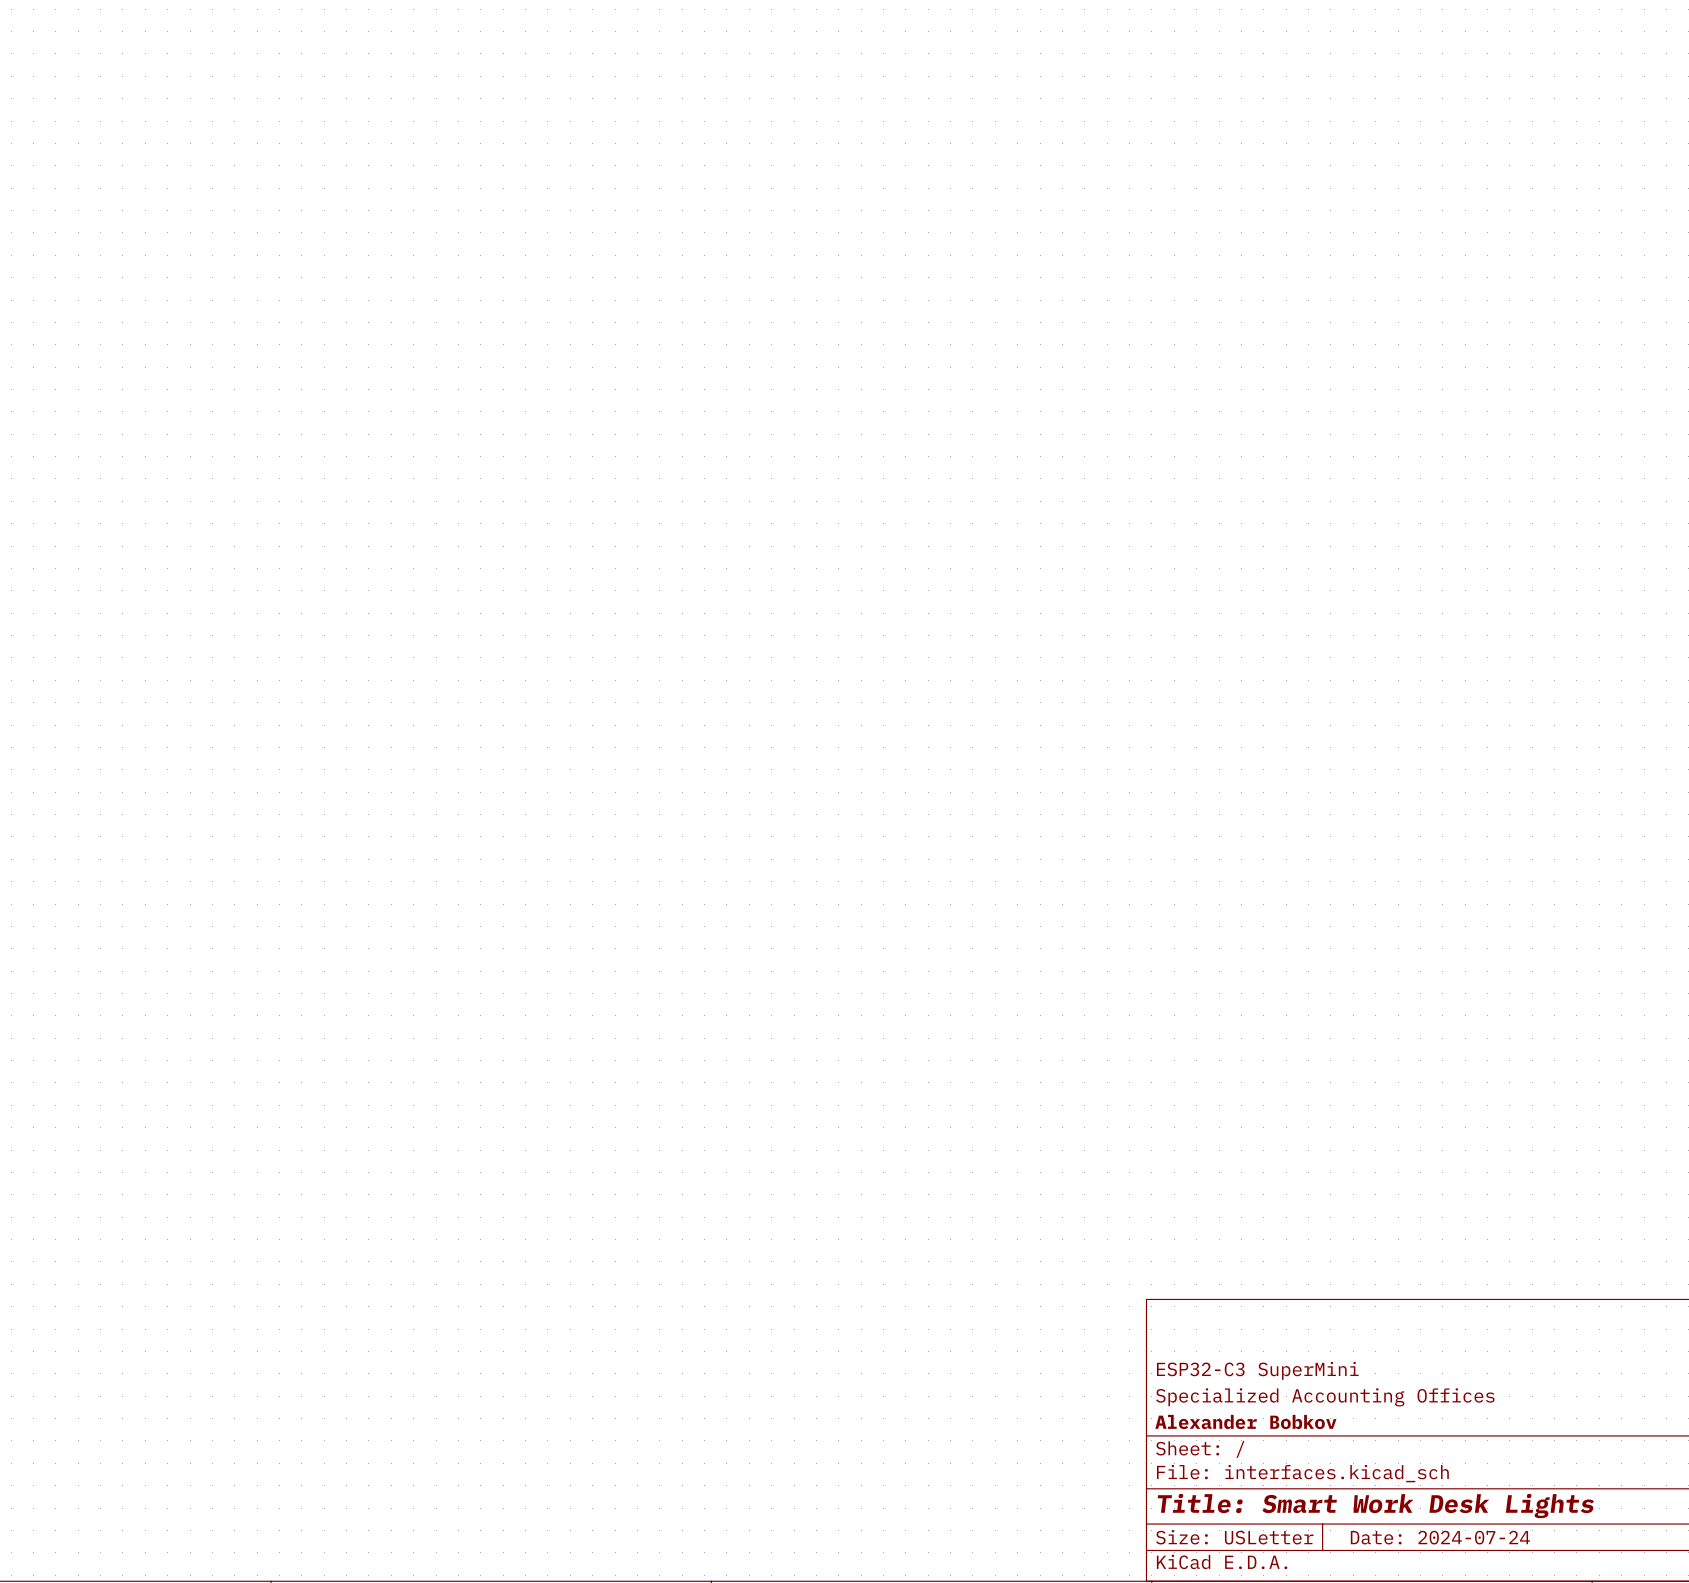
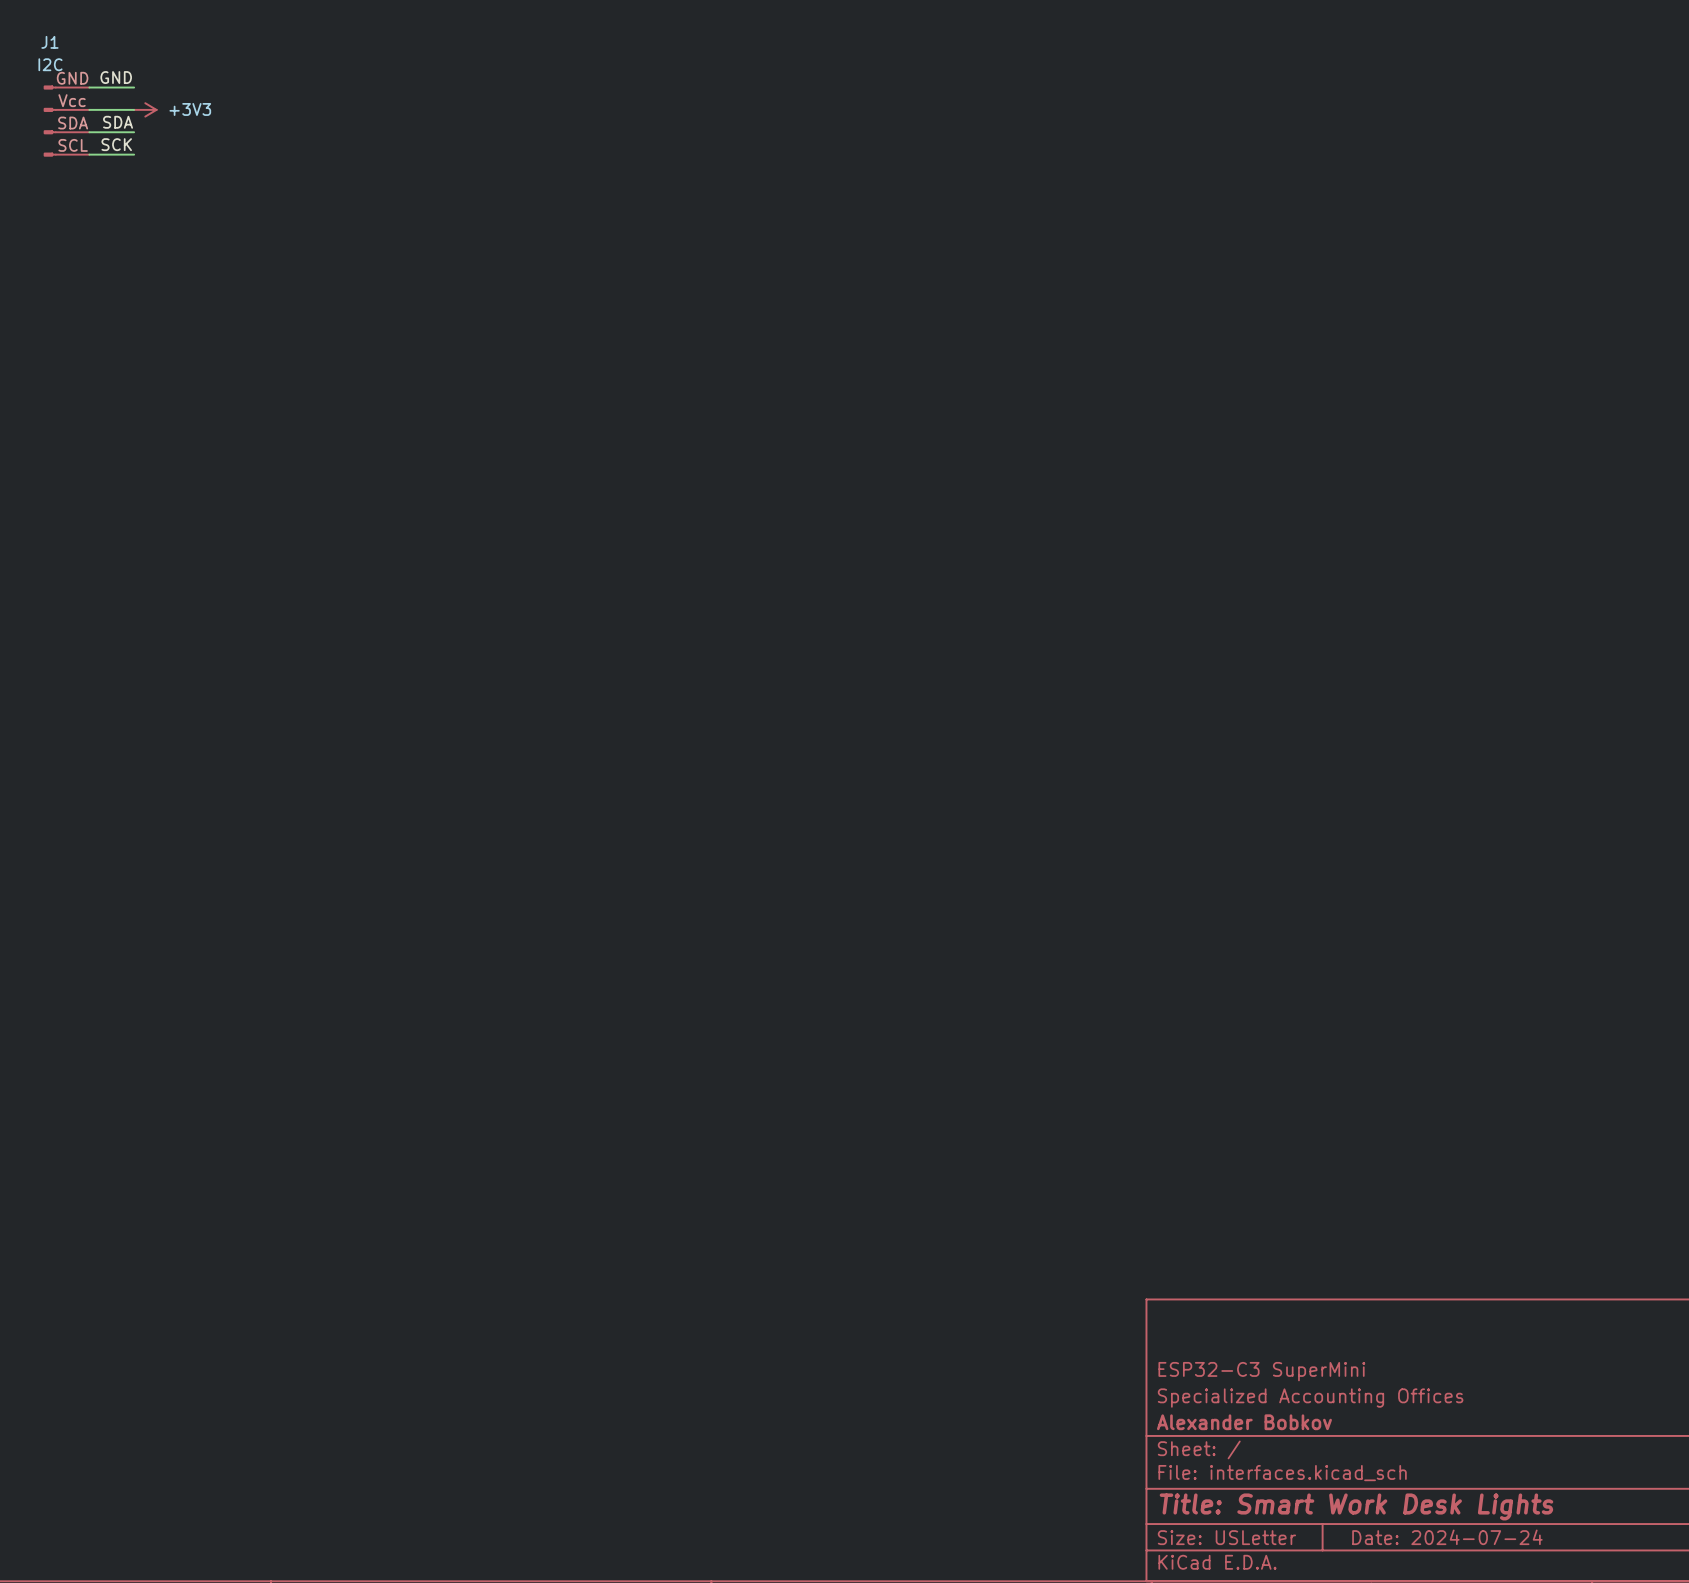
label: none -> GND (116, 77)
wire: none -> (89, 87) (134, 87)
wire: none -> (89, 109) (134, 109)
power symbol: none -> +3V3 (145, 109)
J1: none -> I2C (66, 121)
label: none -> SDA (118, 122)
wire: none -> (89, 132) (134, 132)
label: none -> SCK (116, 144)
wire: none -> (89, 154) (134, 154)

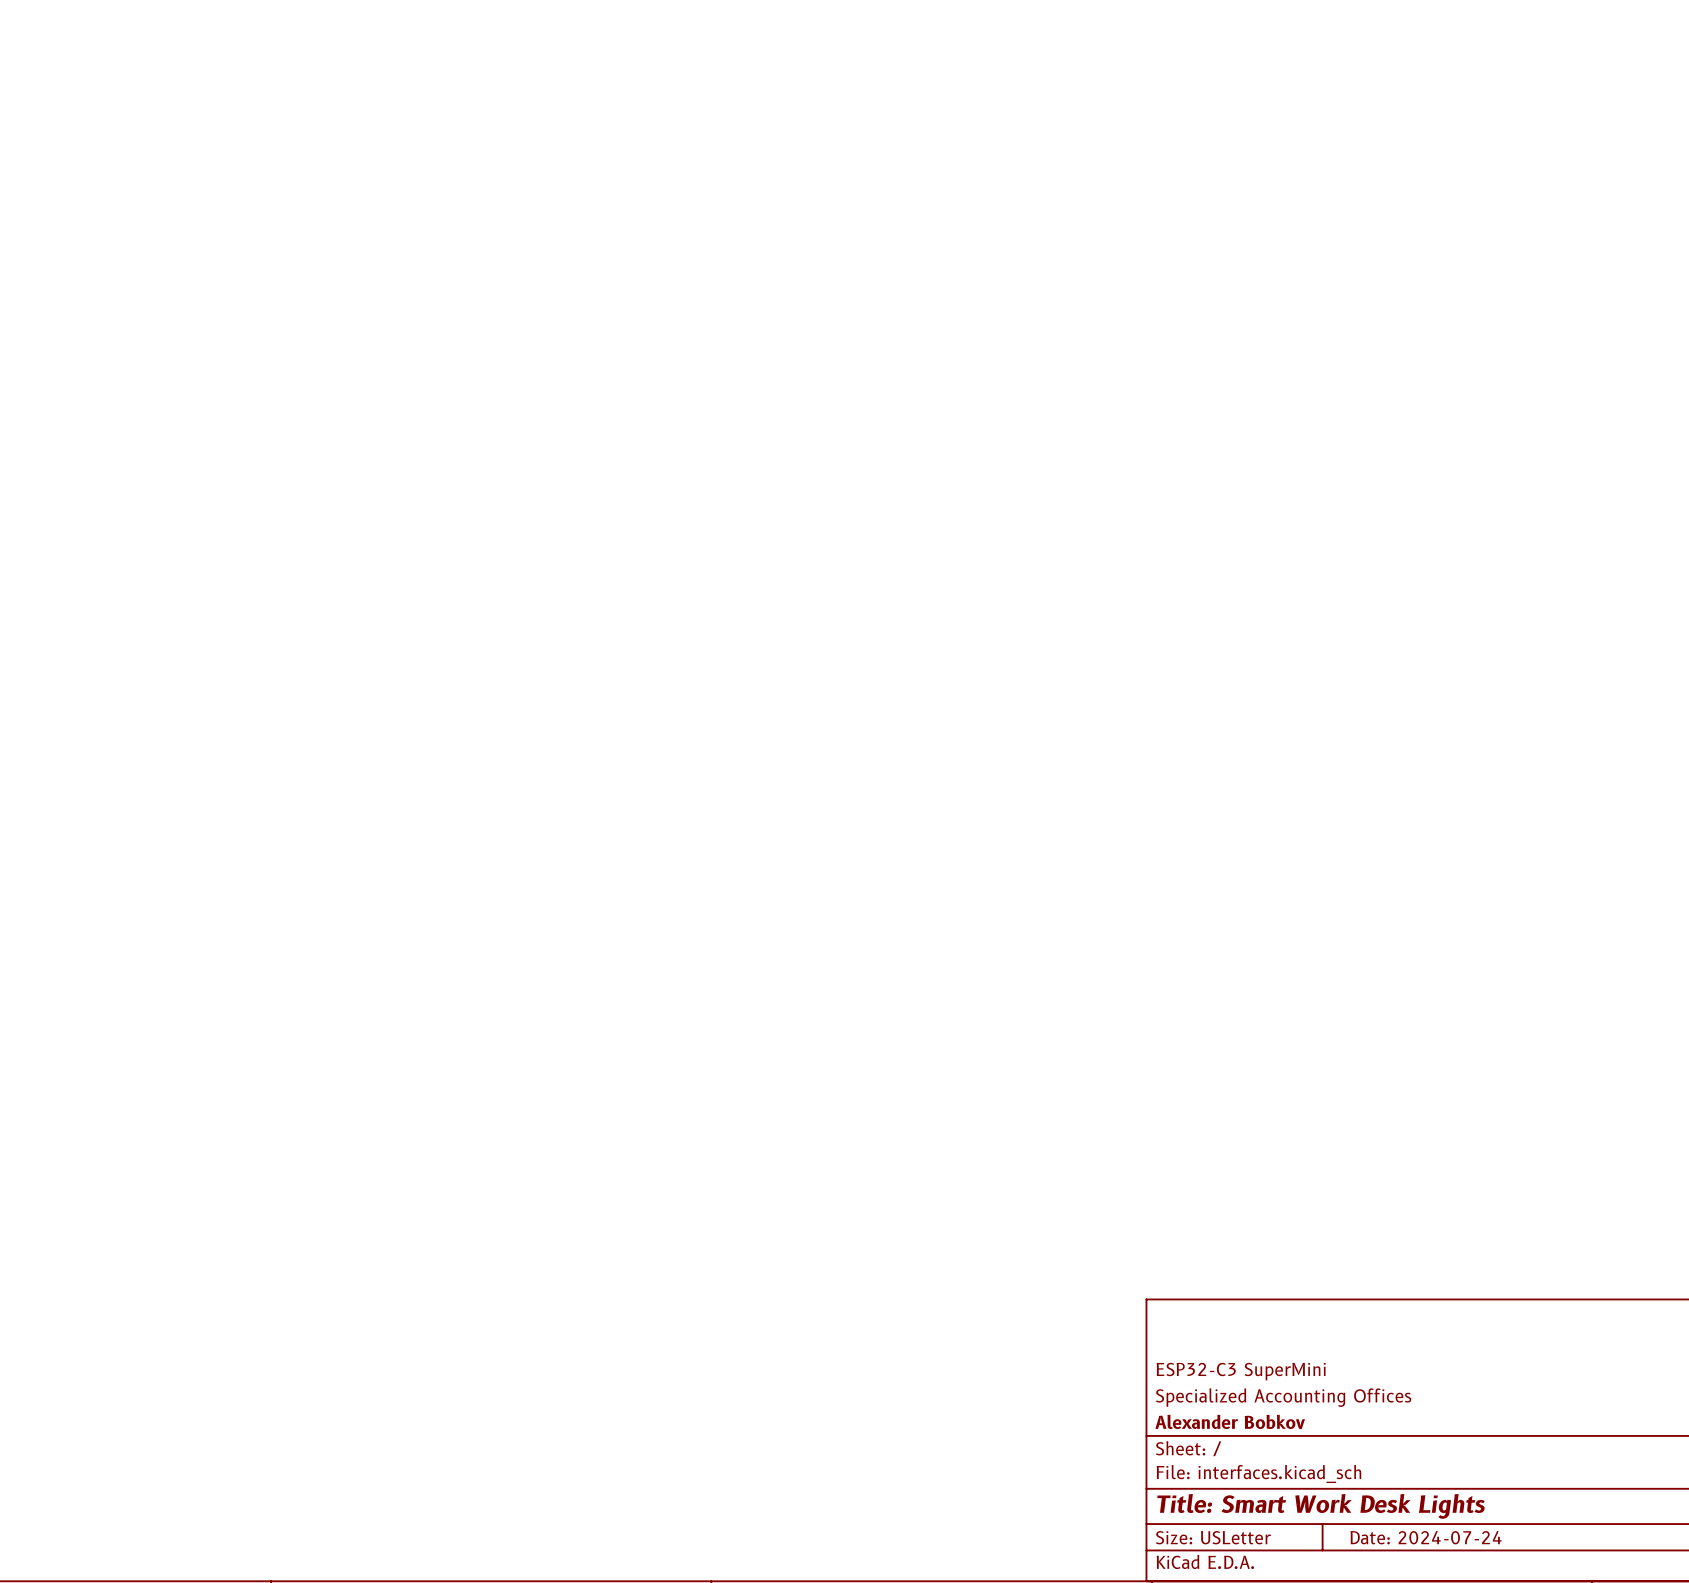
label: GND (116, 77) -> none
wire: (89, 87) (134, 87) -> none
wire: (89, 109) (134, 109) -> none
power symbol: +3V3 (145, 109) -> none
J1: I2C (66, 121) -> none
label: SDA (118, 122) -> none
wire: (89, 132) (134, 132) -> none
label: SCK (116, 144) -> none
wire: (89, 154) (134, 154) -> none

